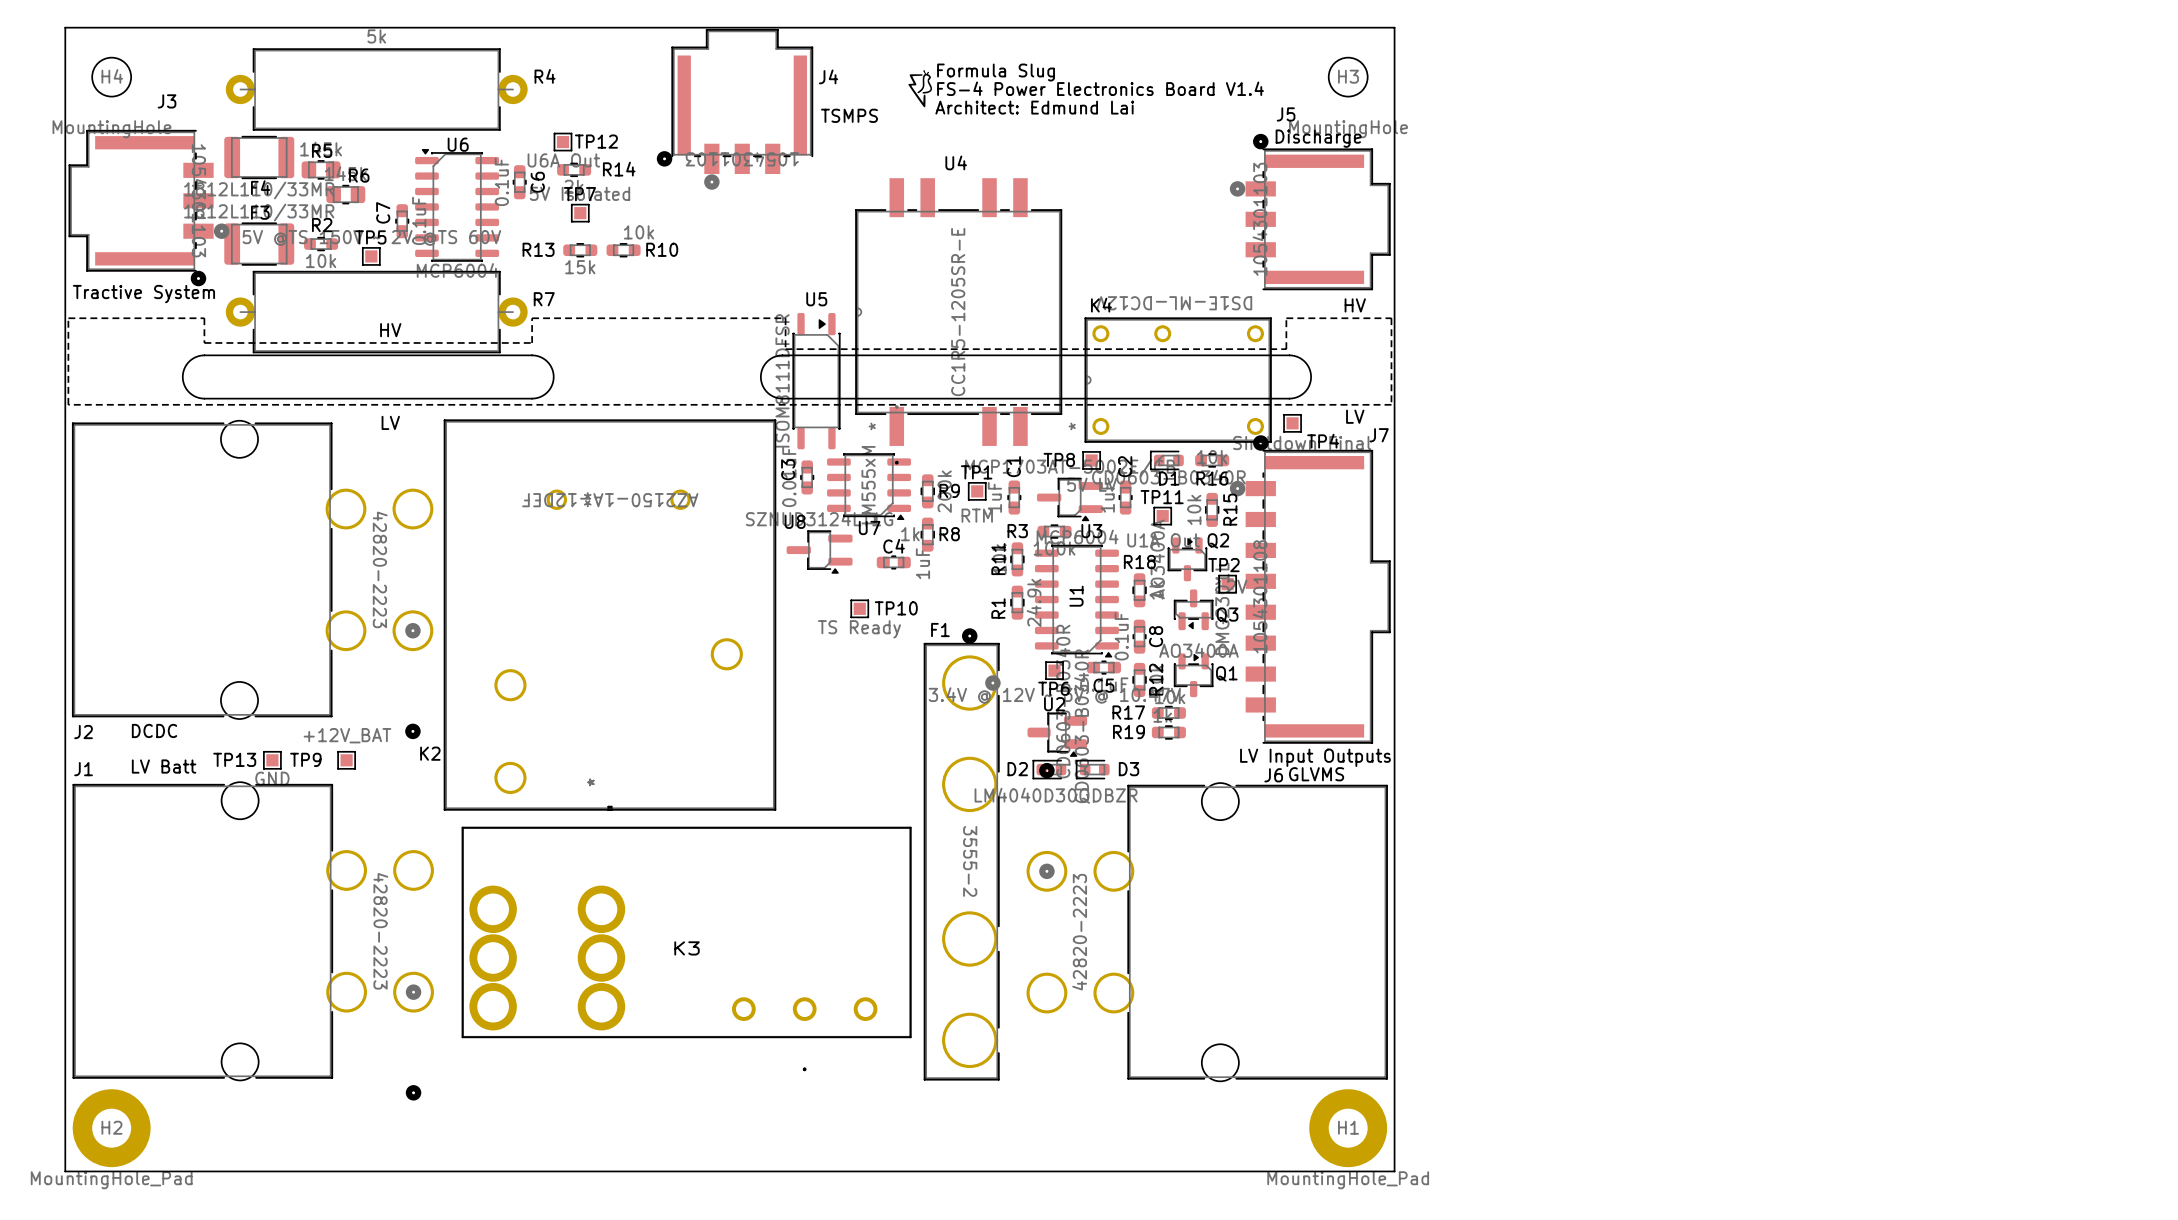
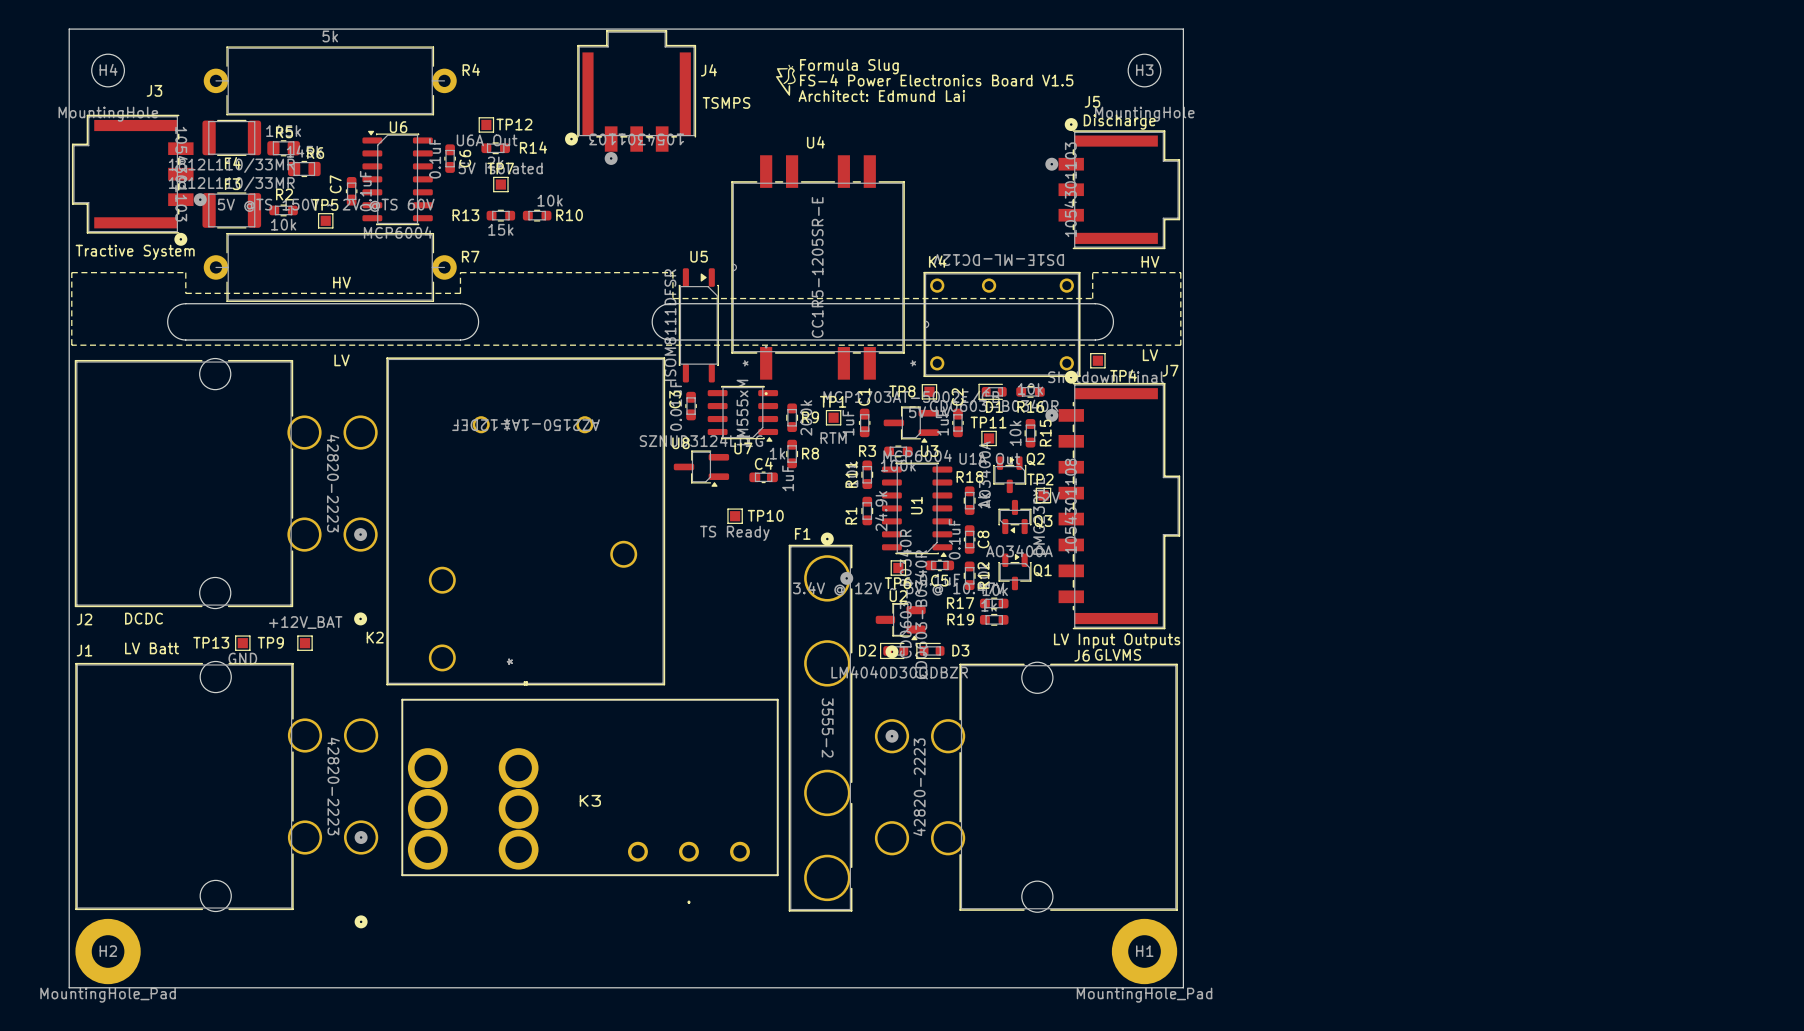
drawing shape: [908, 63, 1264, 115] -> [775, 59, 1074, 103]

